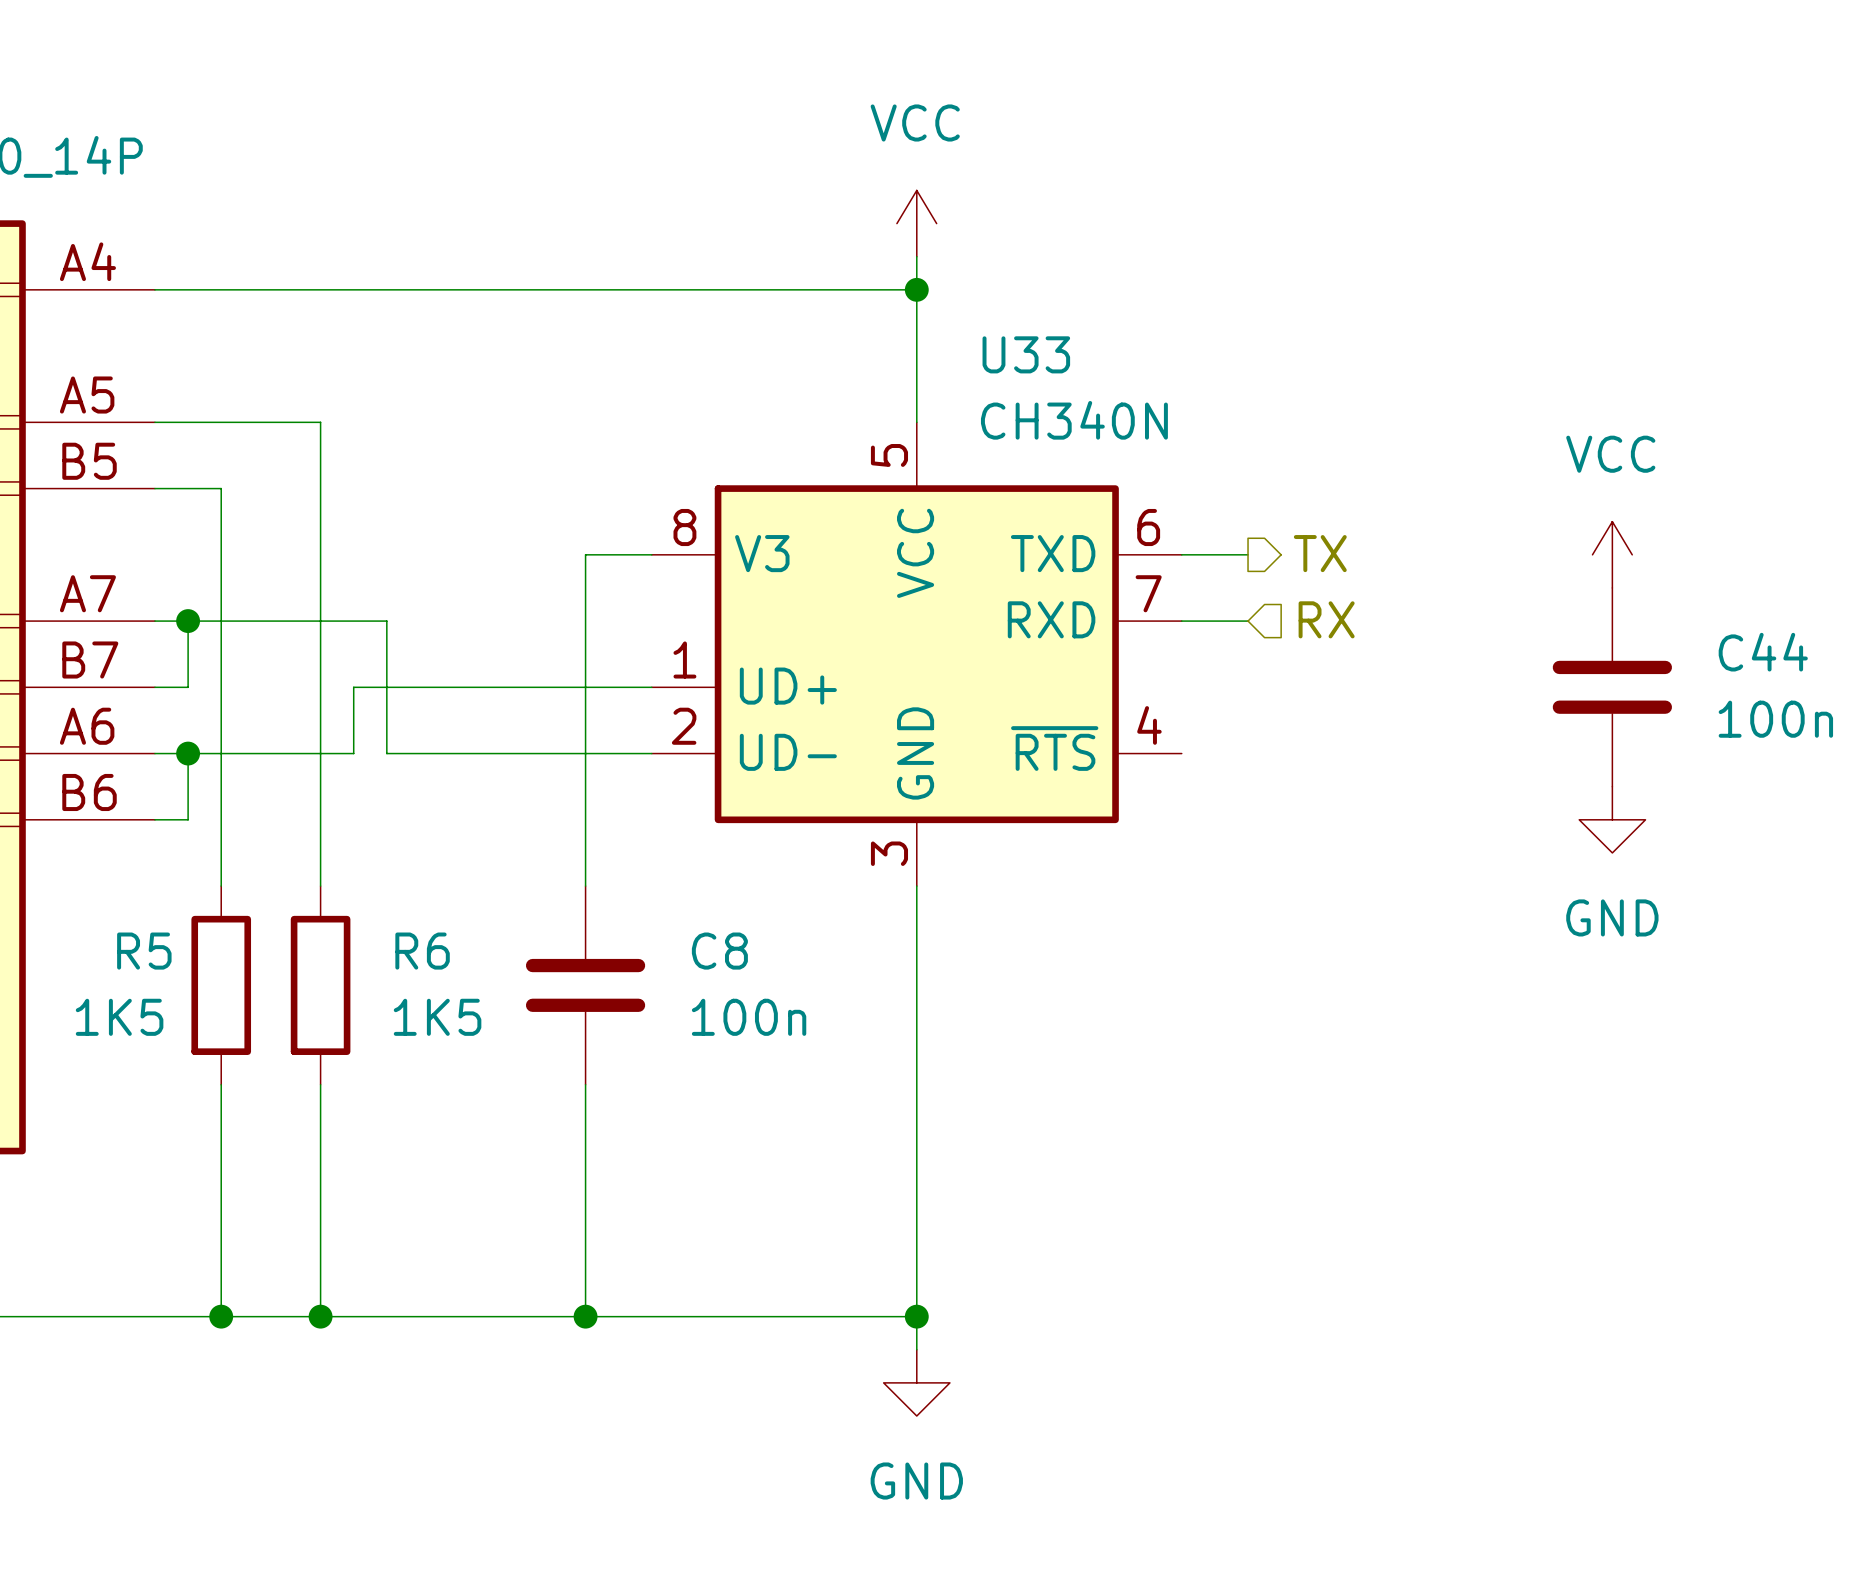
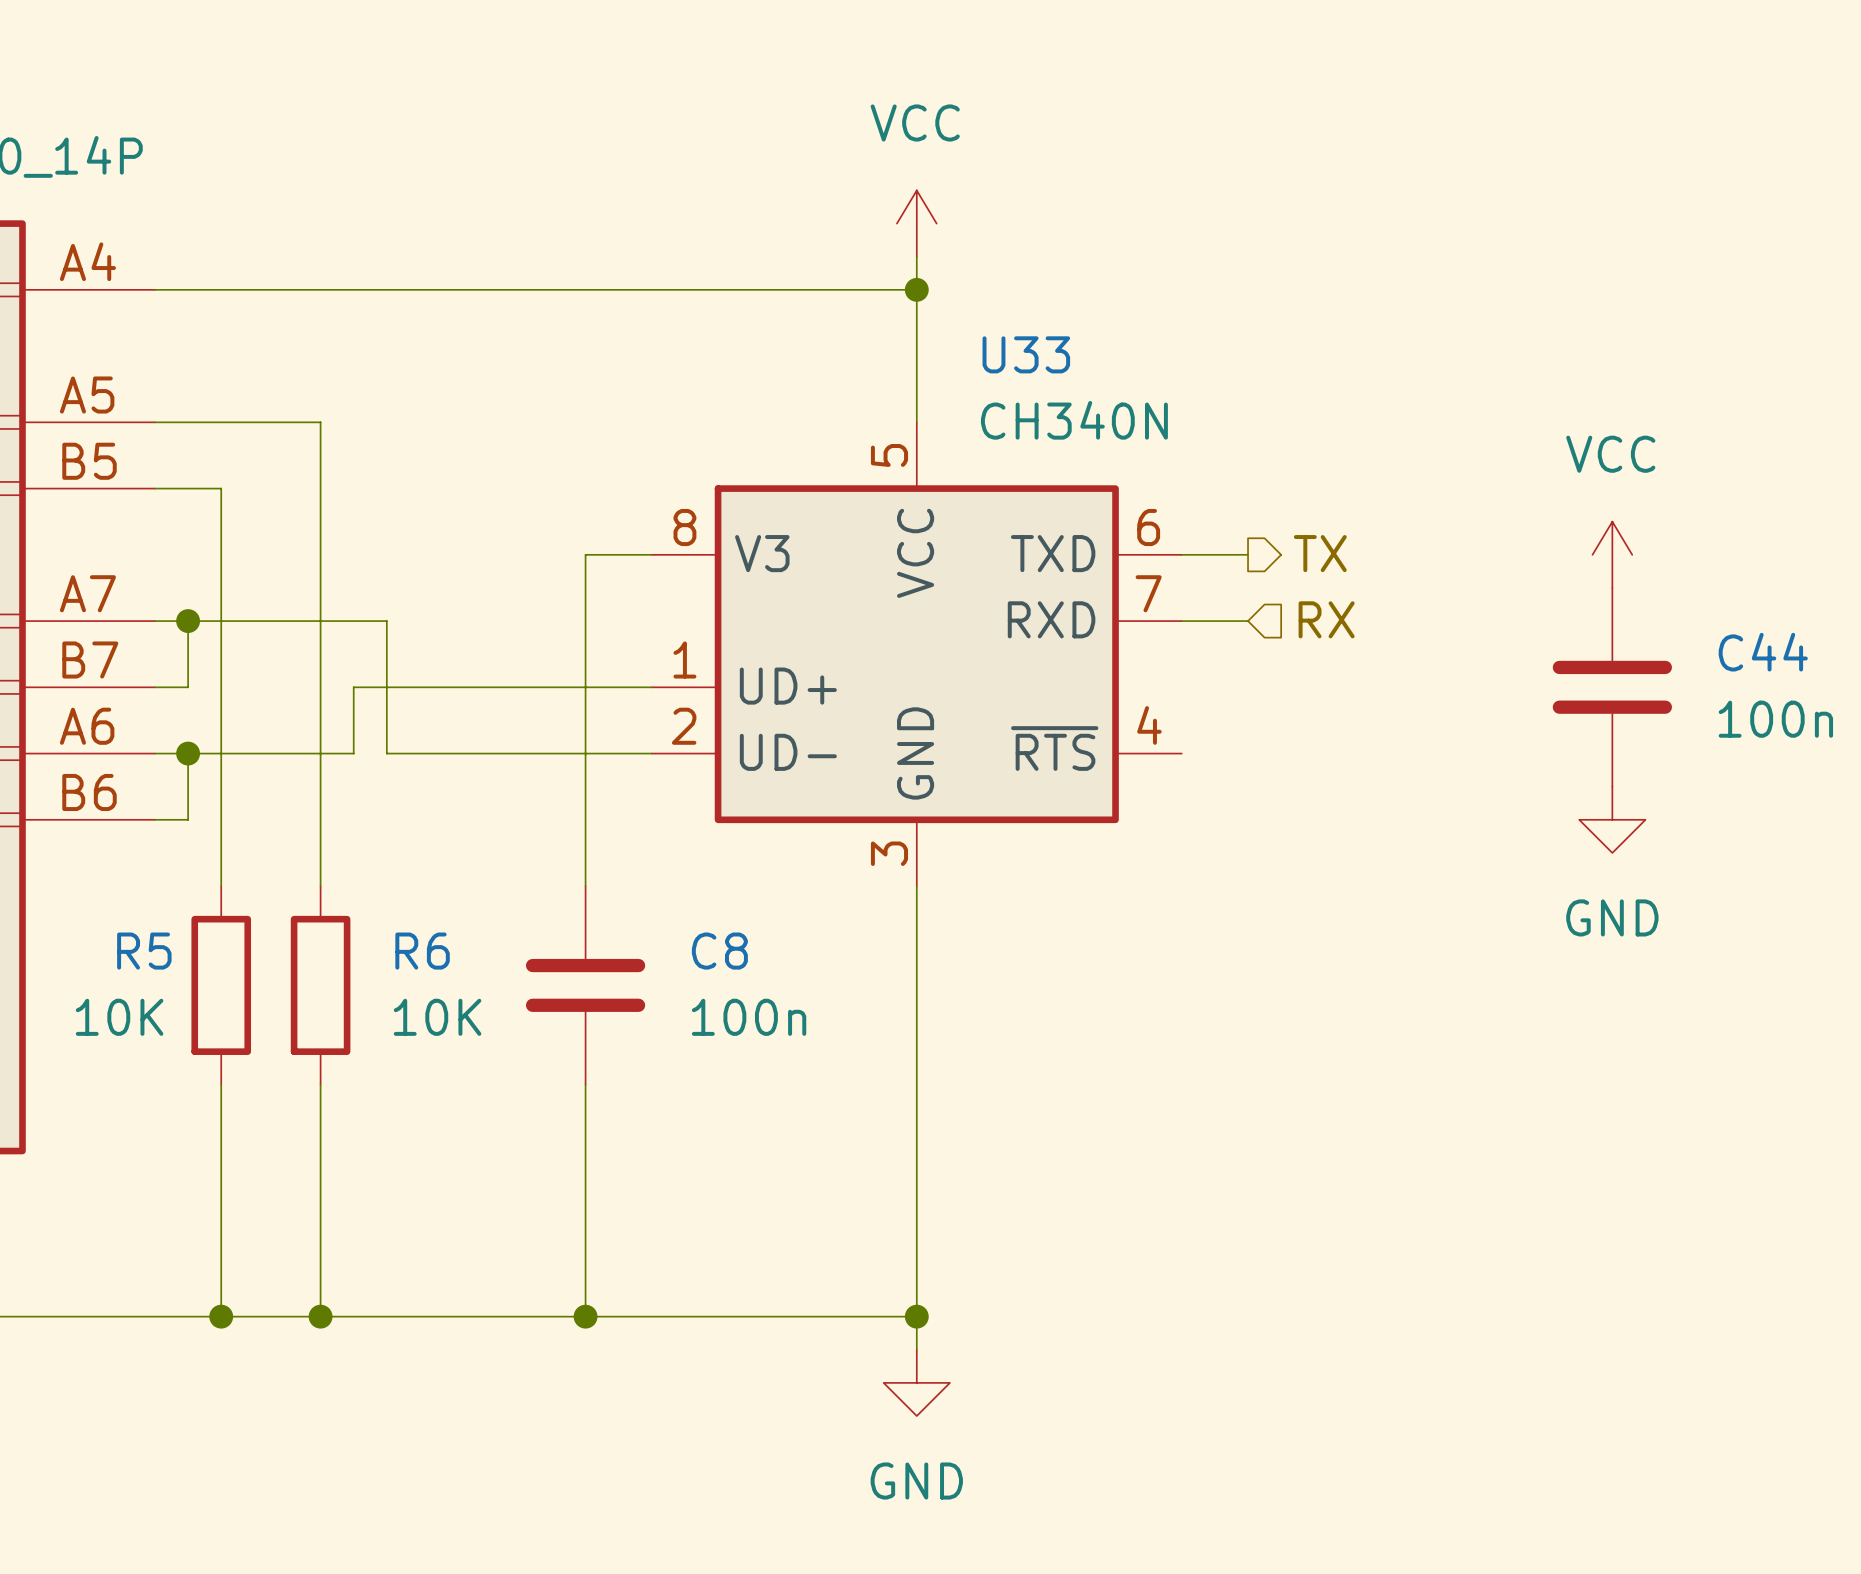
R5 value: 1K5 (119, 1017) -> 10K (119, 1017)
R6 value: 1K5 (437, 1017) -> 10K (437, 1017)

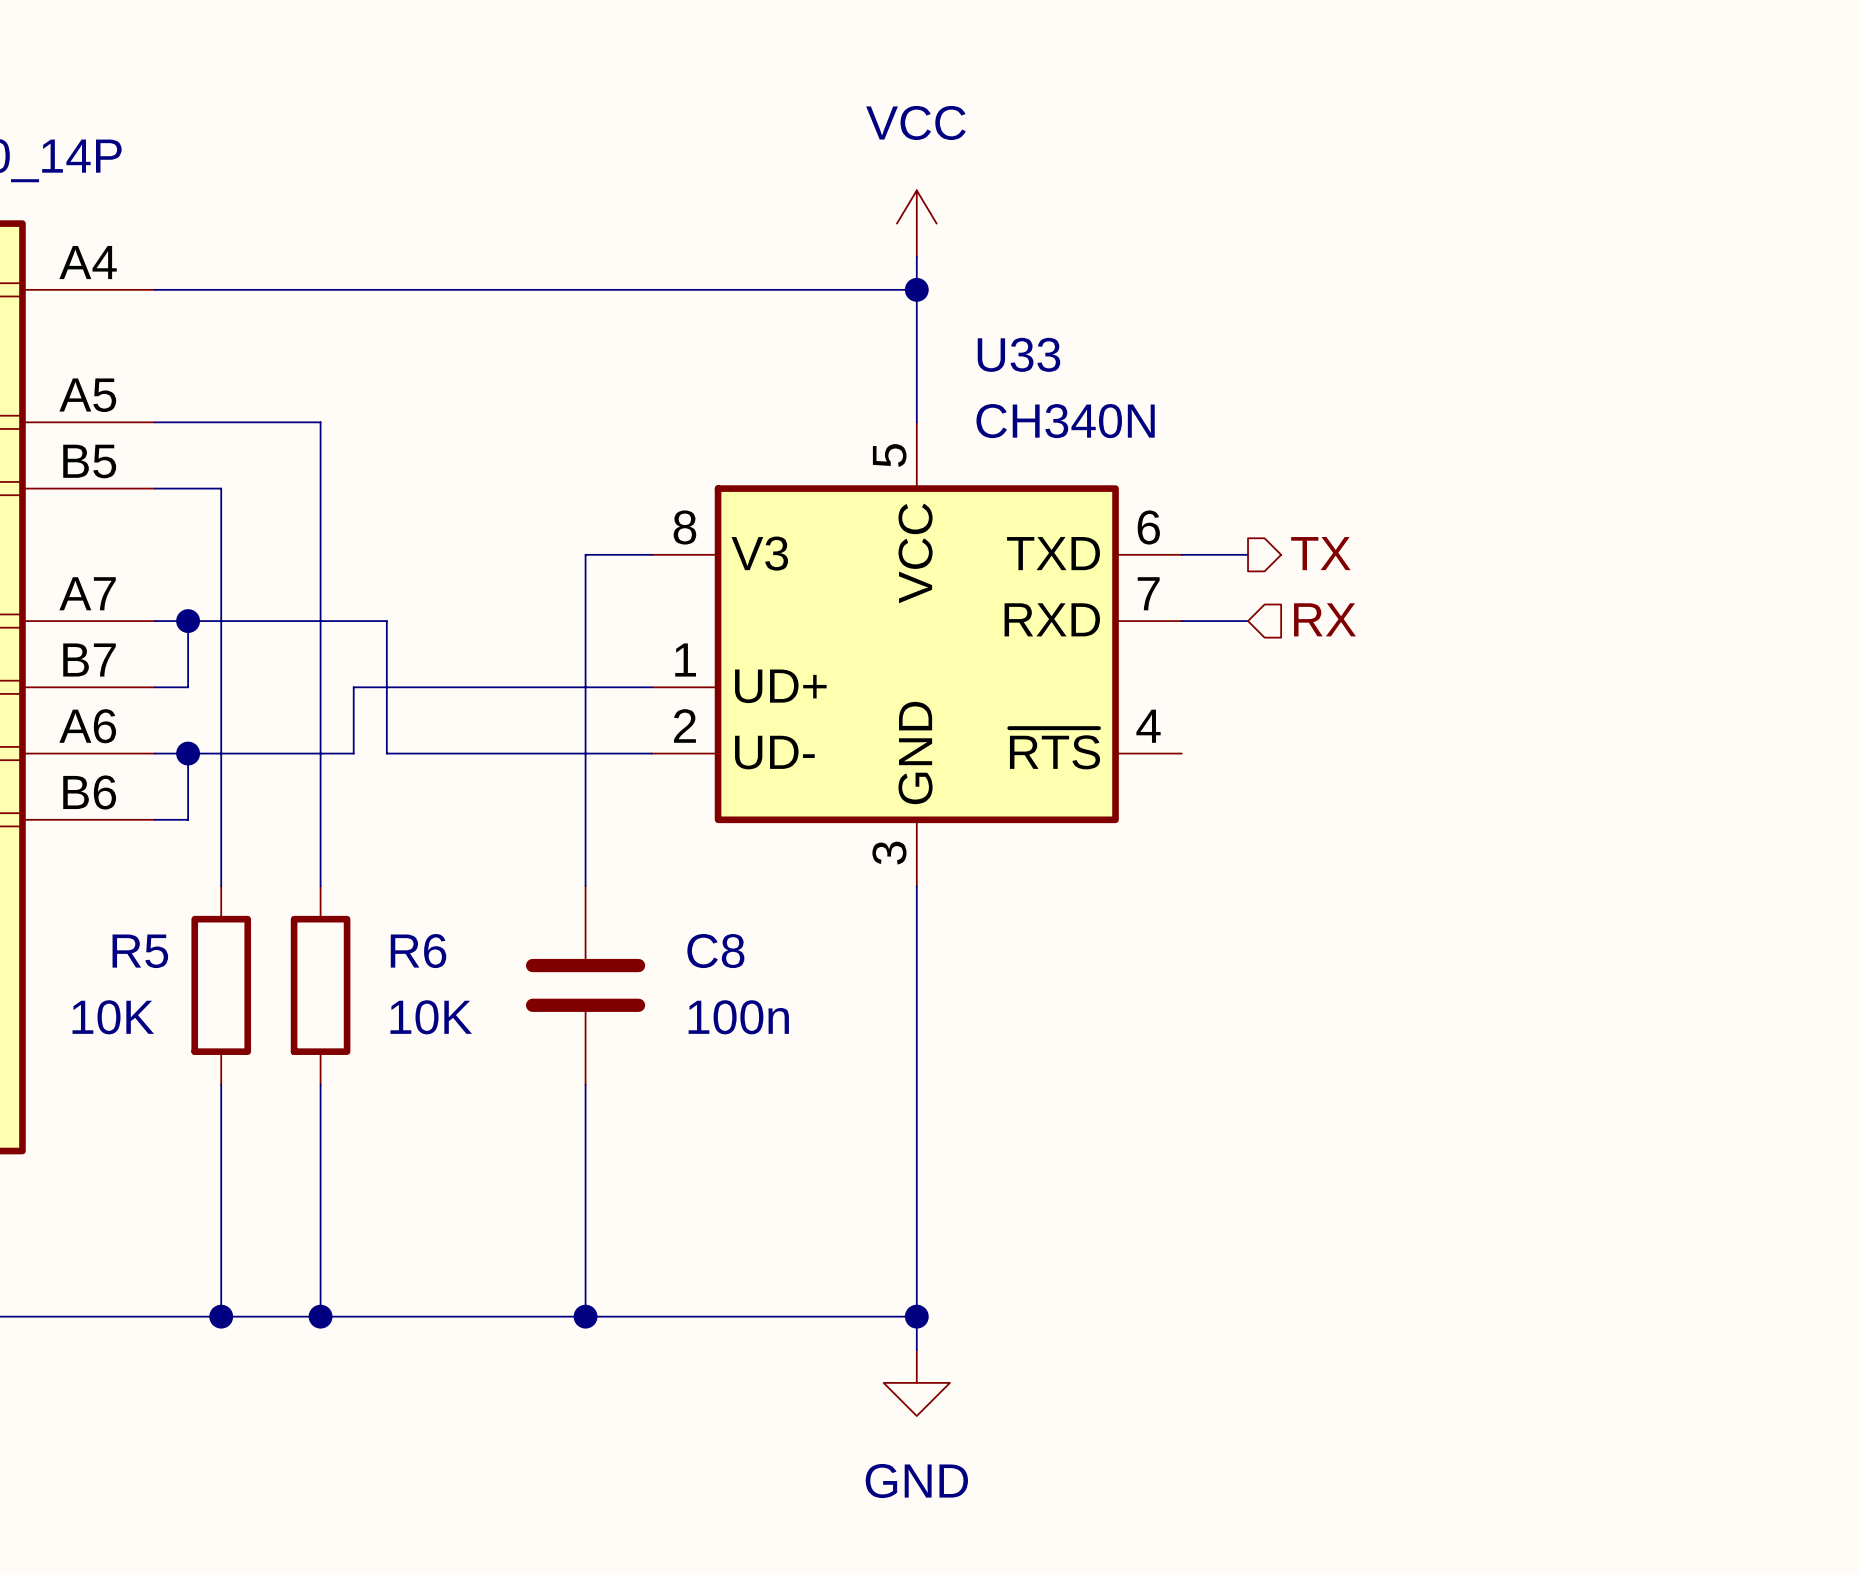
power symbol: VCC (1612, 554) -> none
C44: 100n (1612, 687) -> none
power symbol: GND (1612, 819) -> none

